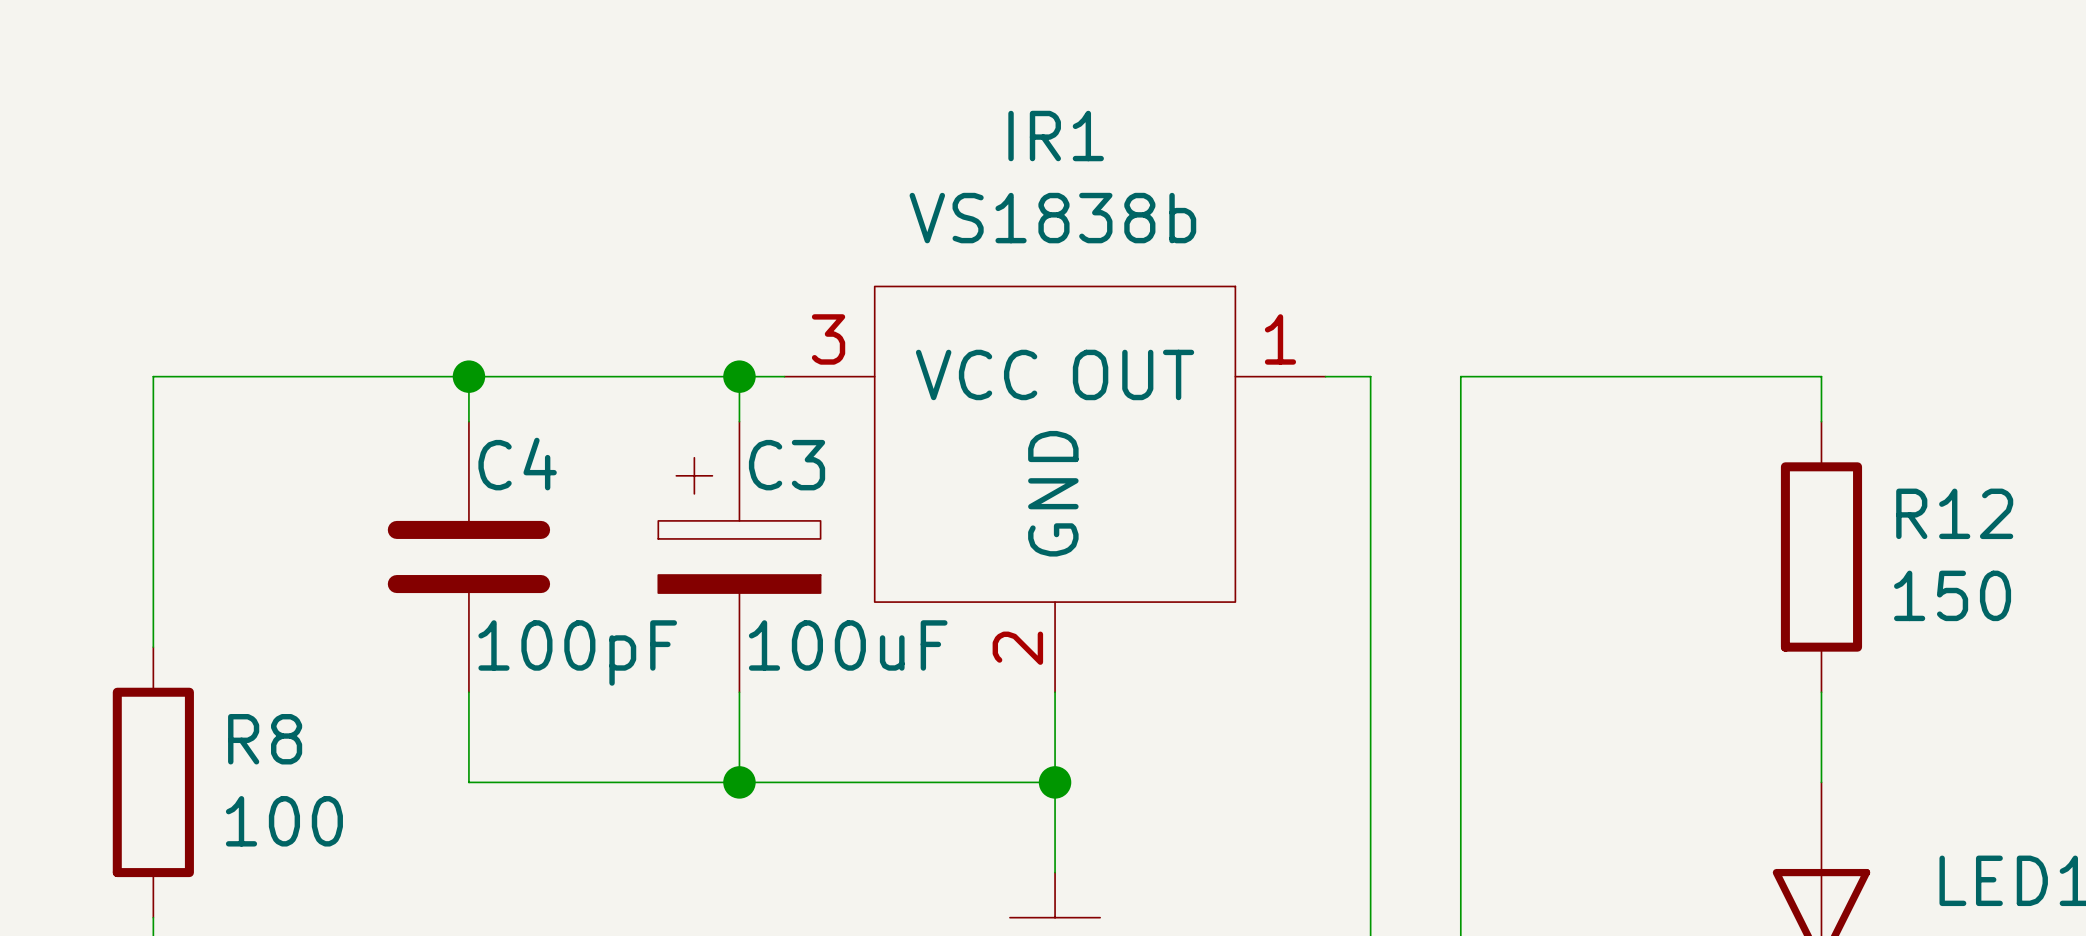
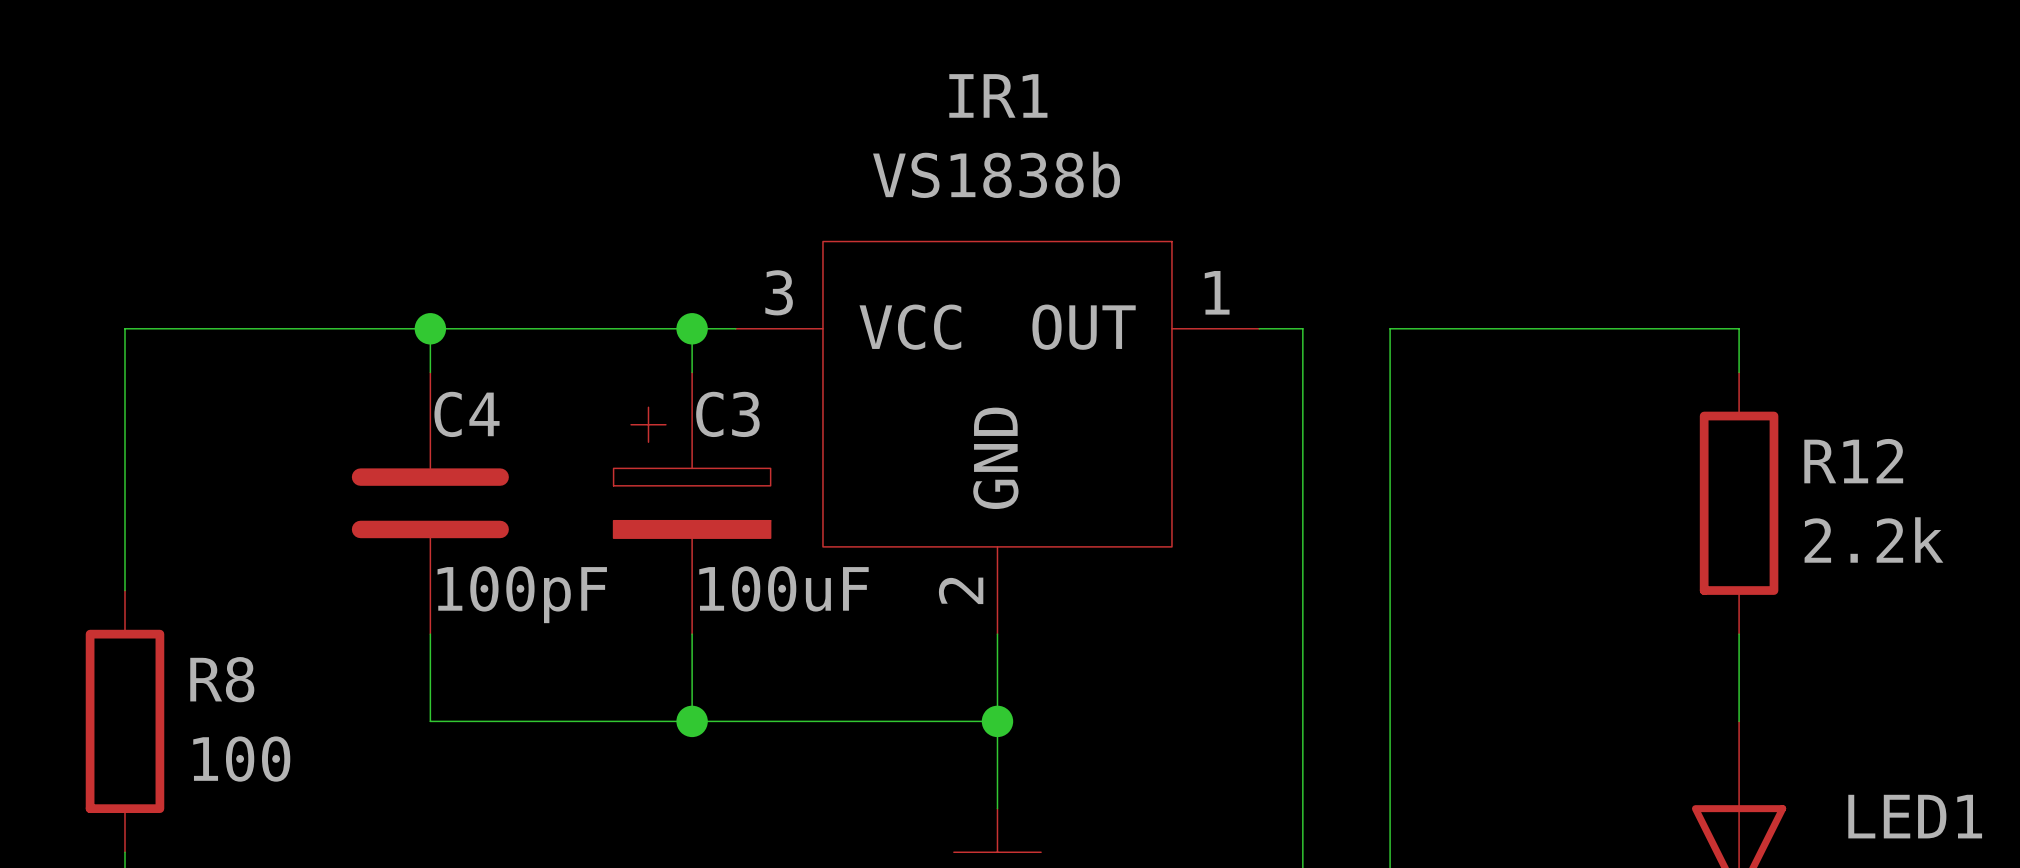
R12 value: 150 (1952, 595) -> 2.2k (1873, 539)

